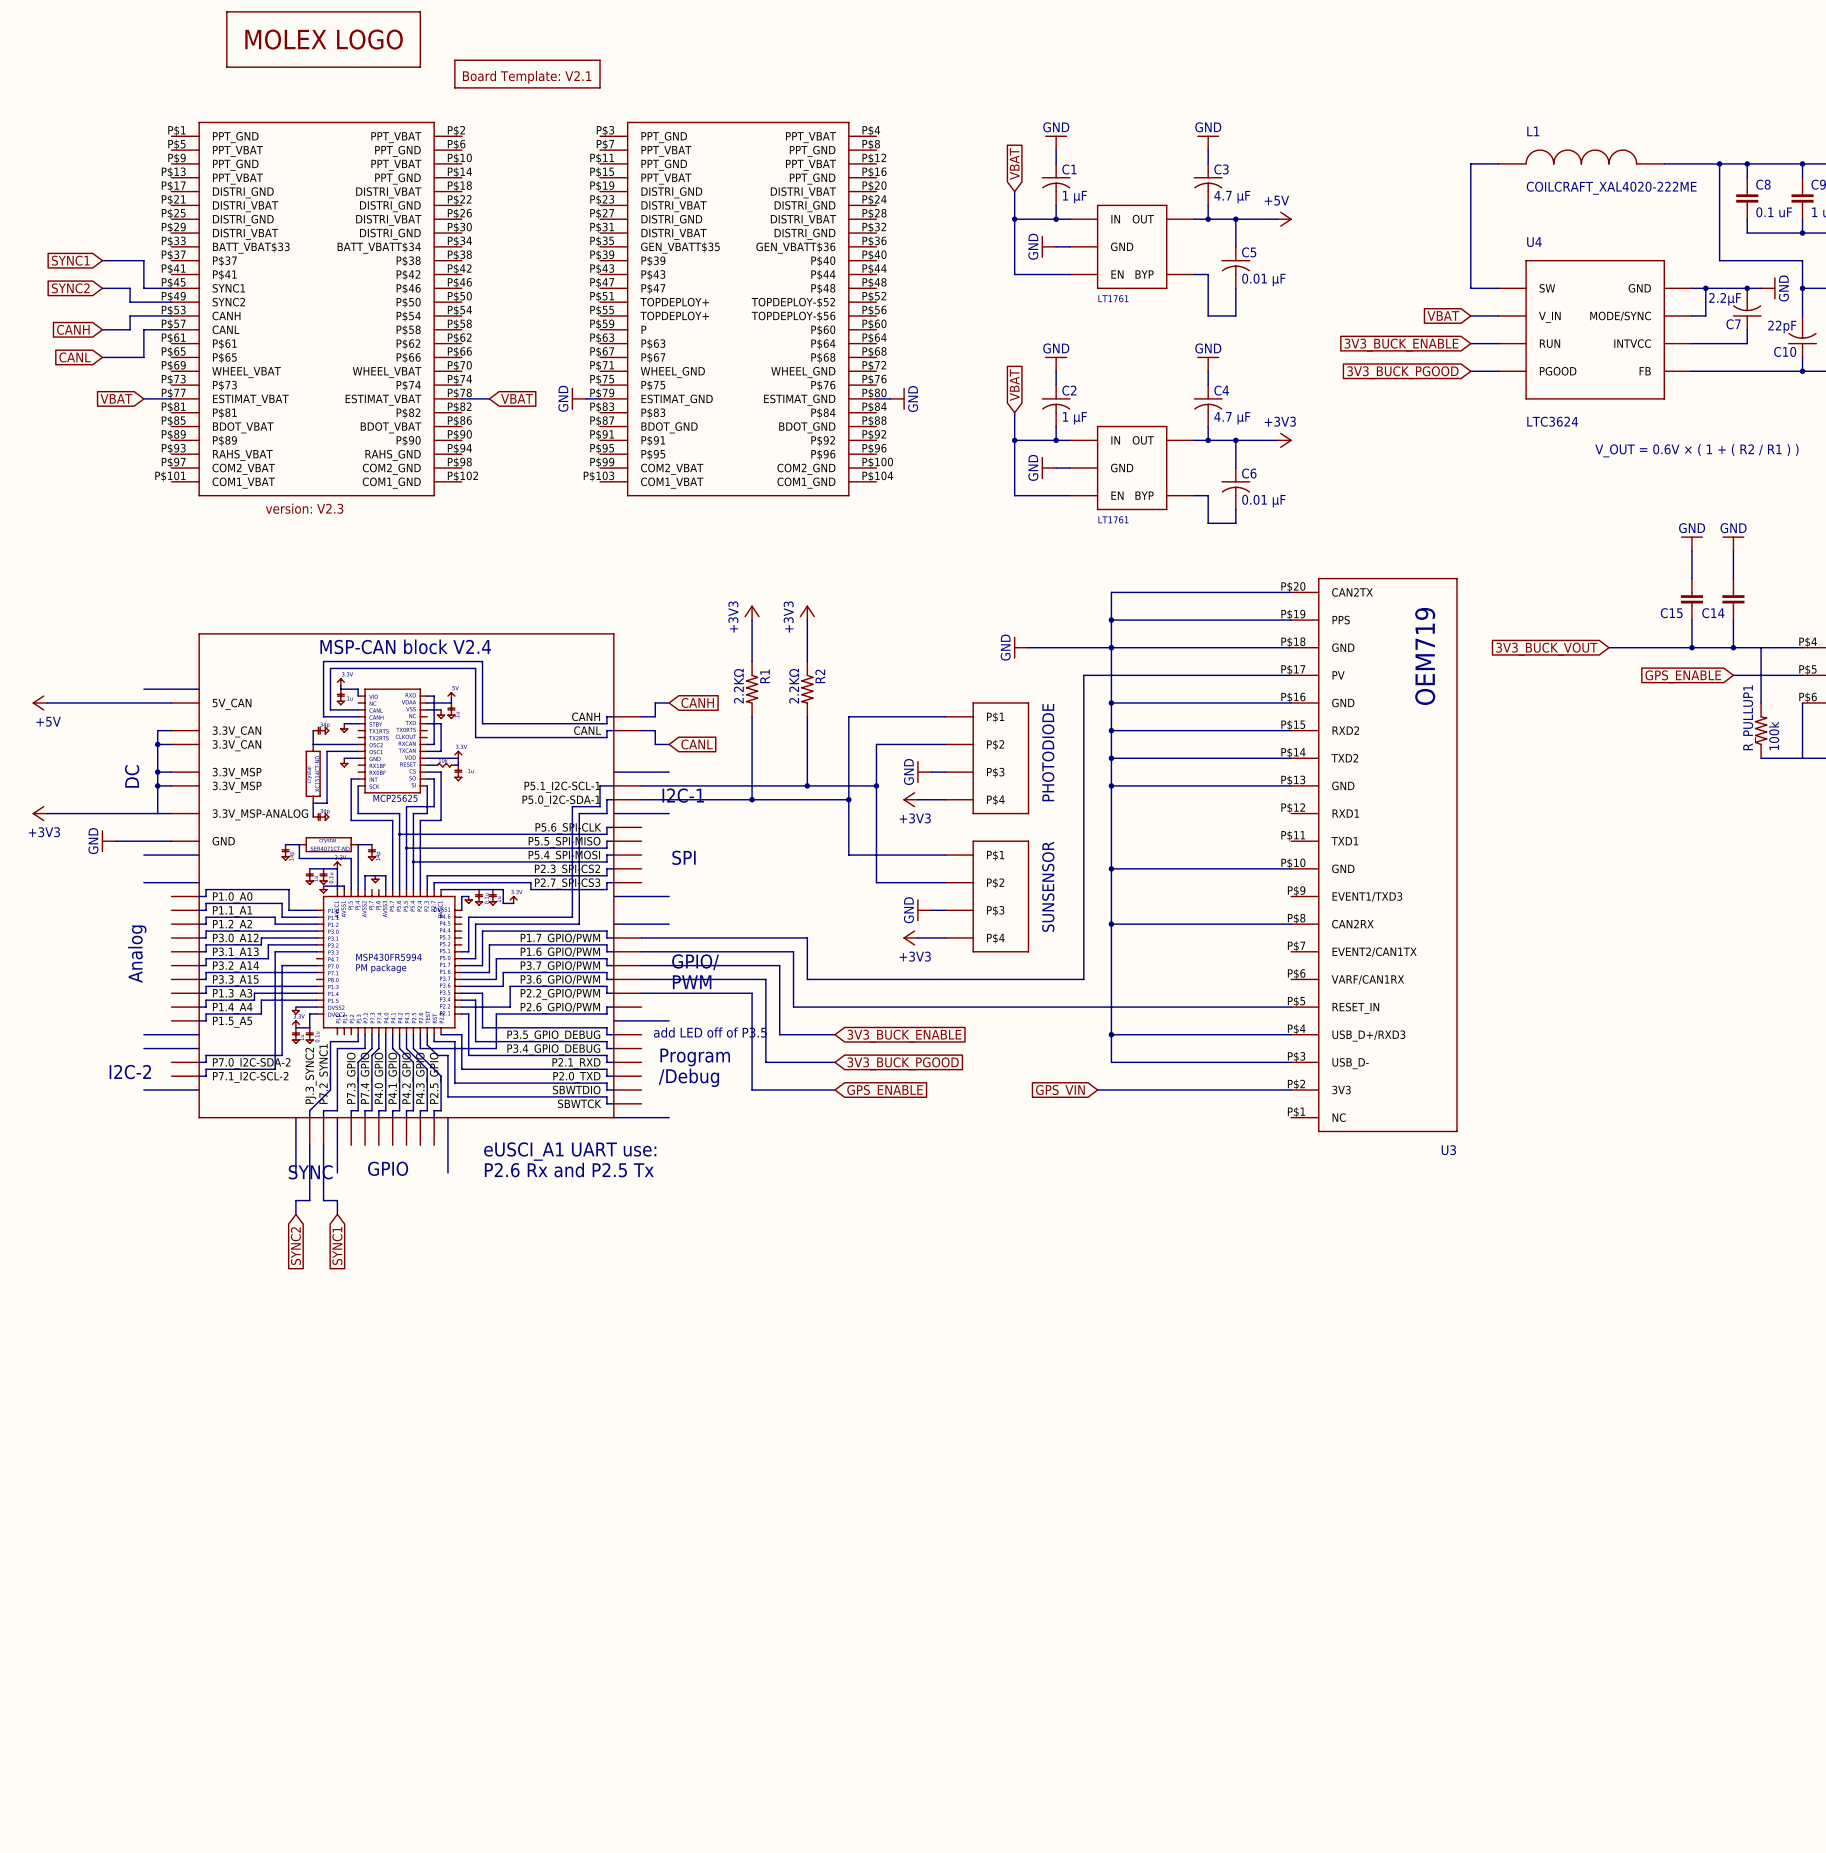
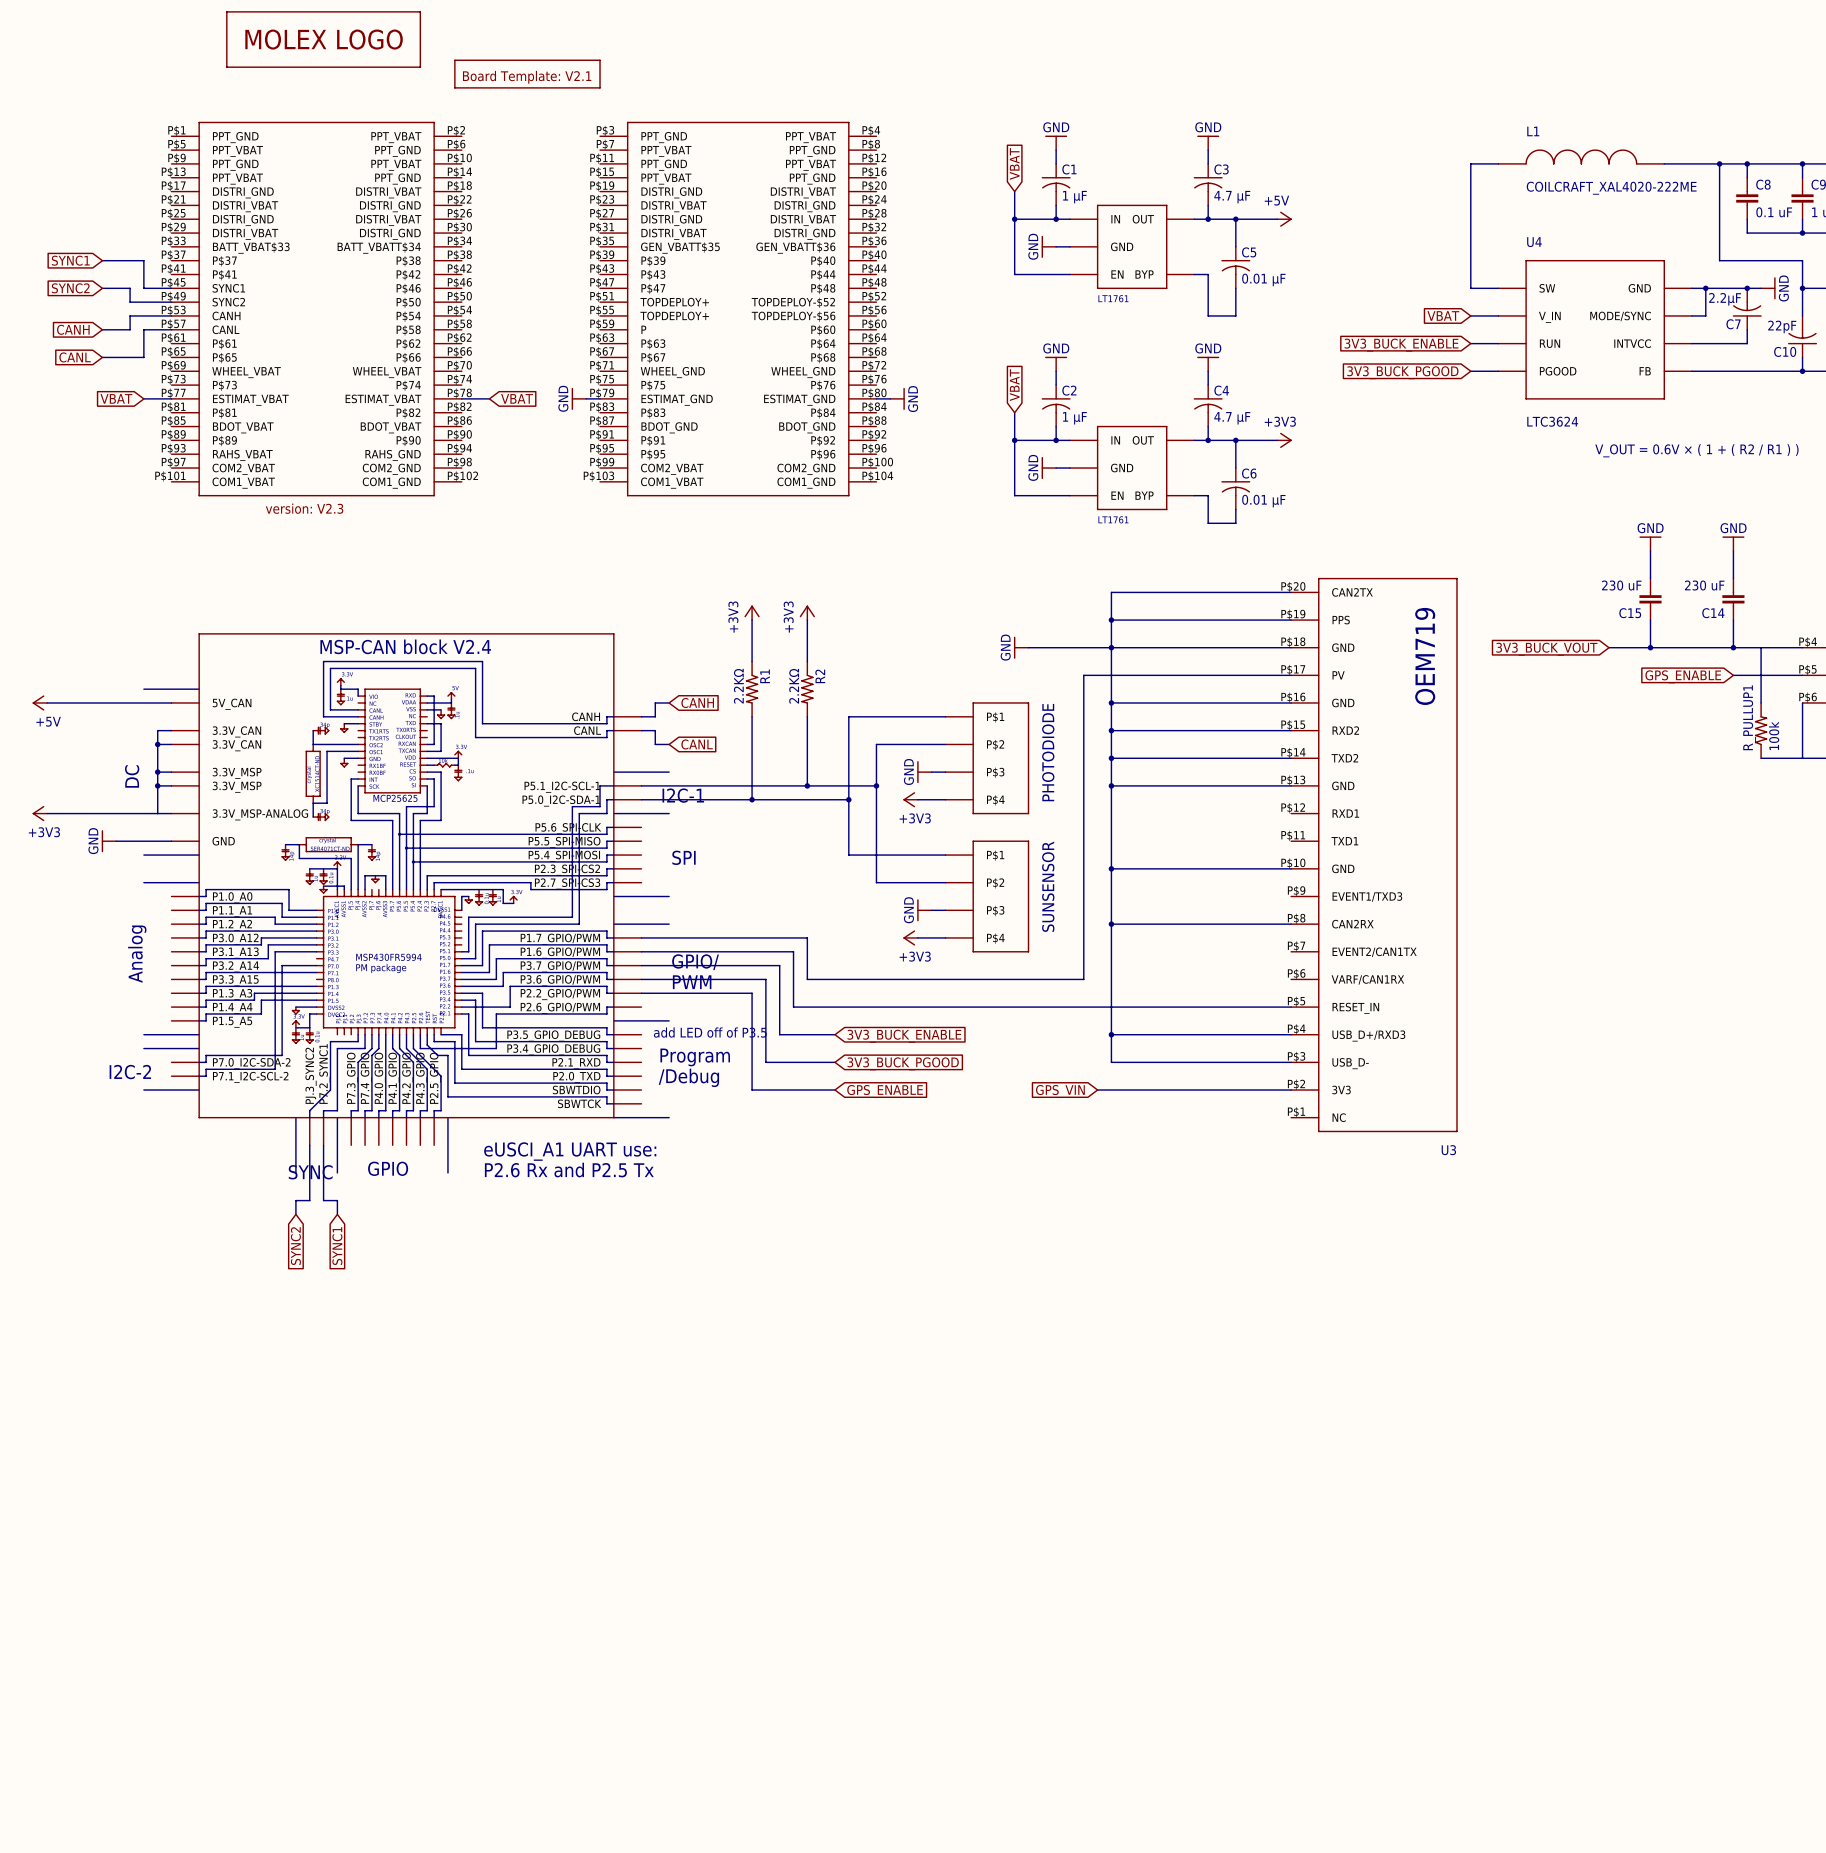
power symbol position: GND (1691, 543) -> GND (1650, 543)
wire: (1691, 550) (1691, 578) -> (1650, 550) (1650, 578)
C15 value: none -> 230 uF (1621, 585)
C14 value: none -> 230 uF (1704, 585)
C15 position: (1691, 599) -> (1650, 599)
wire: (1691, 620) (1691, 647) -> (1650, 620) (1650, 647)
junction: none -> (1650, 647)
junction: (1691, 647) -> none

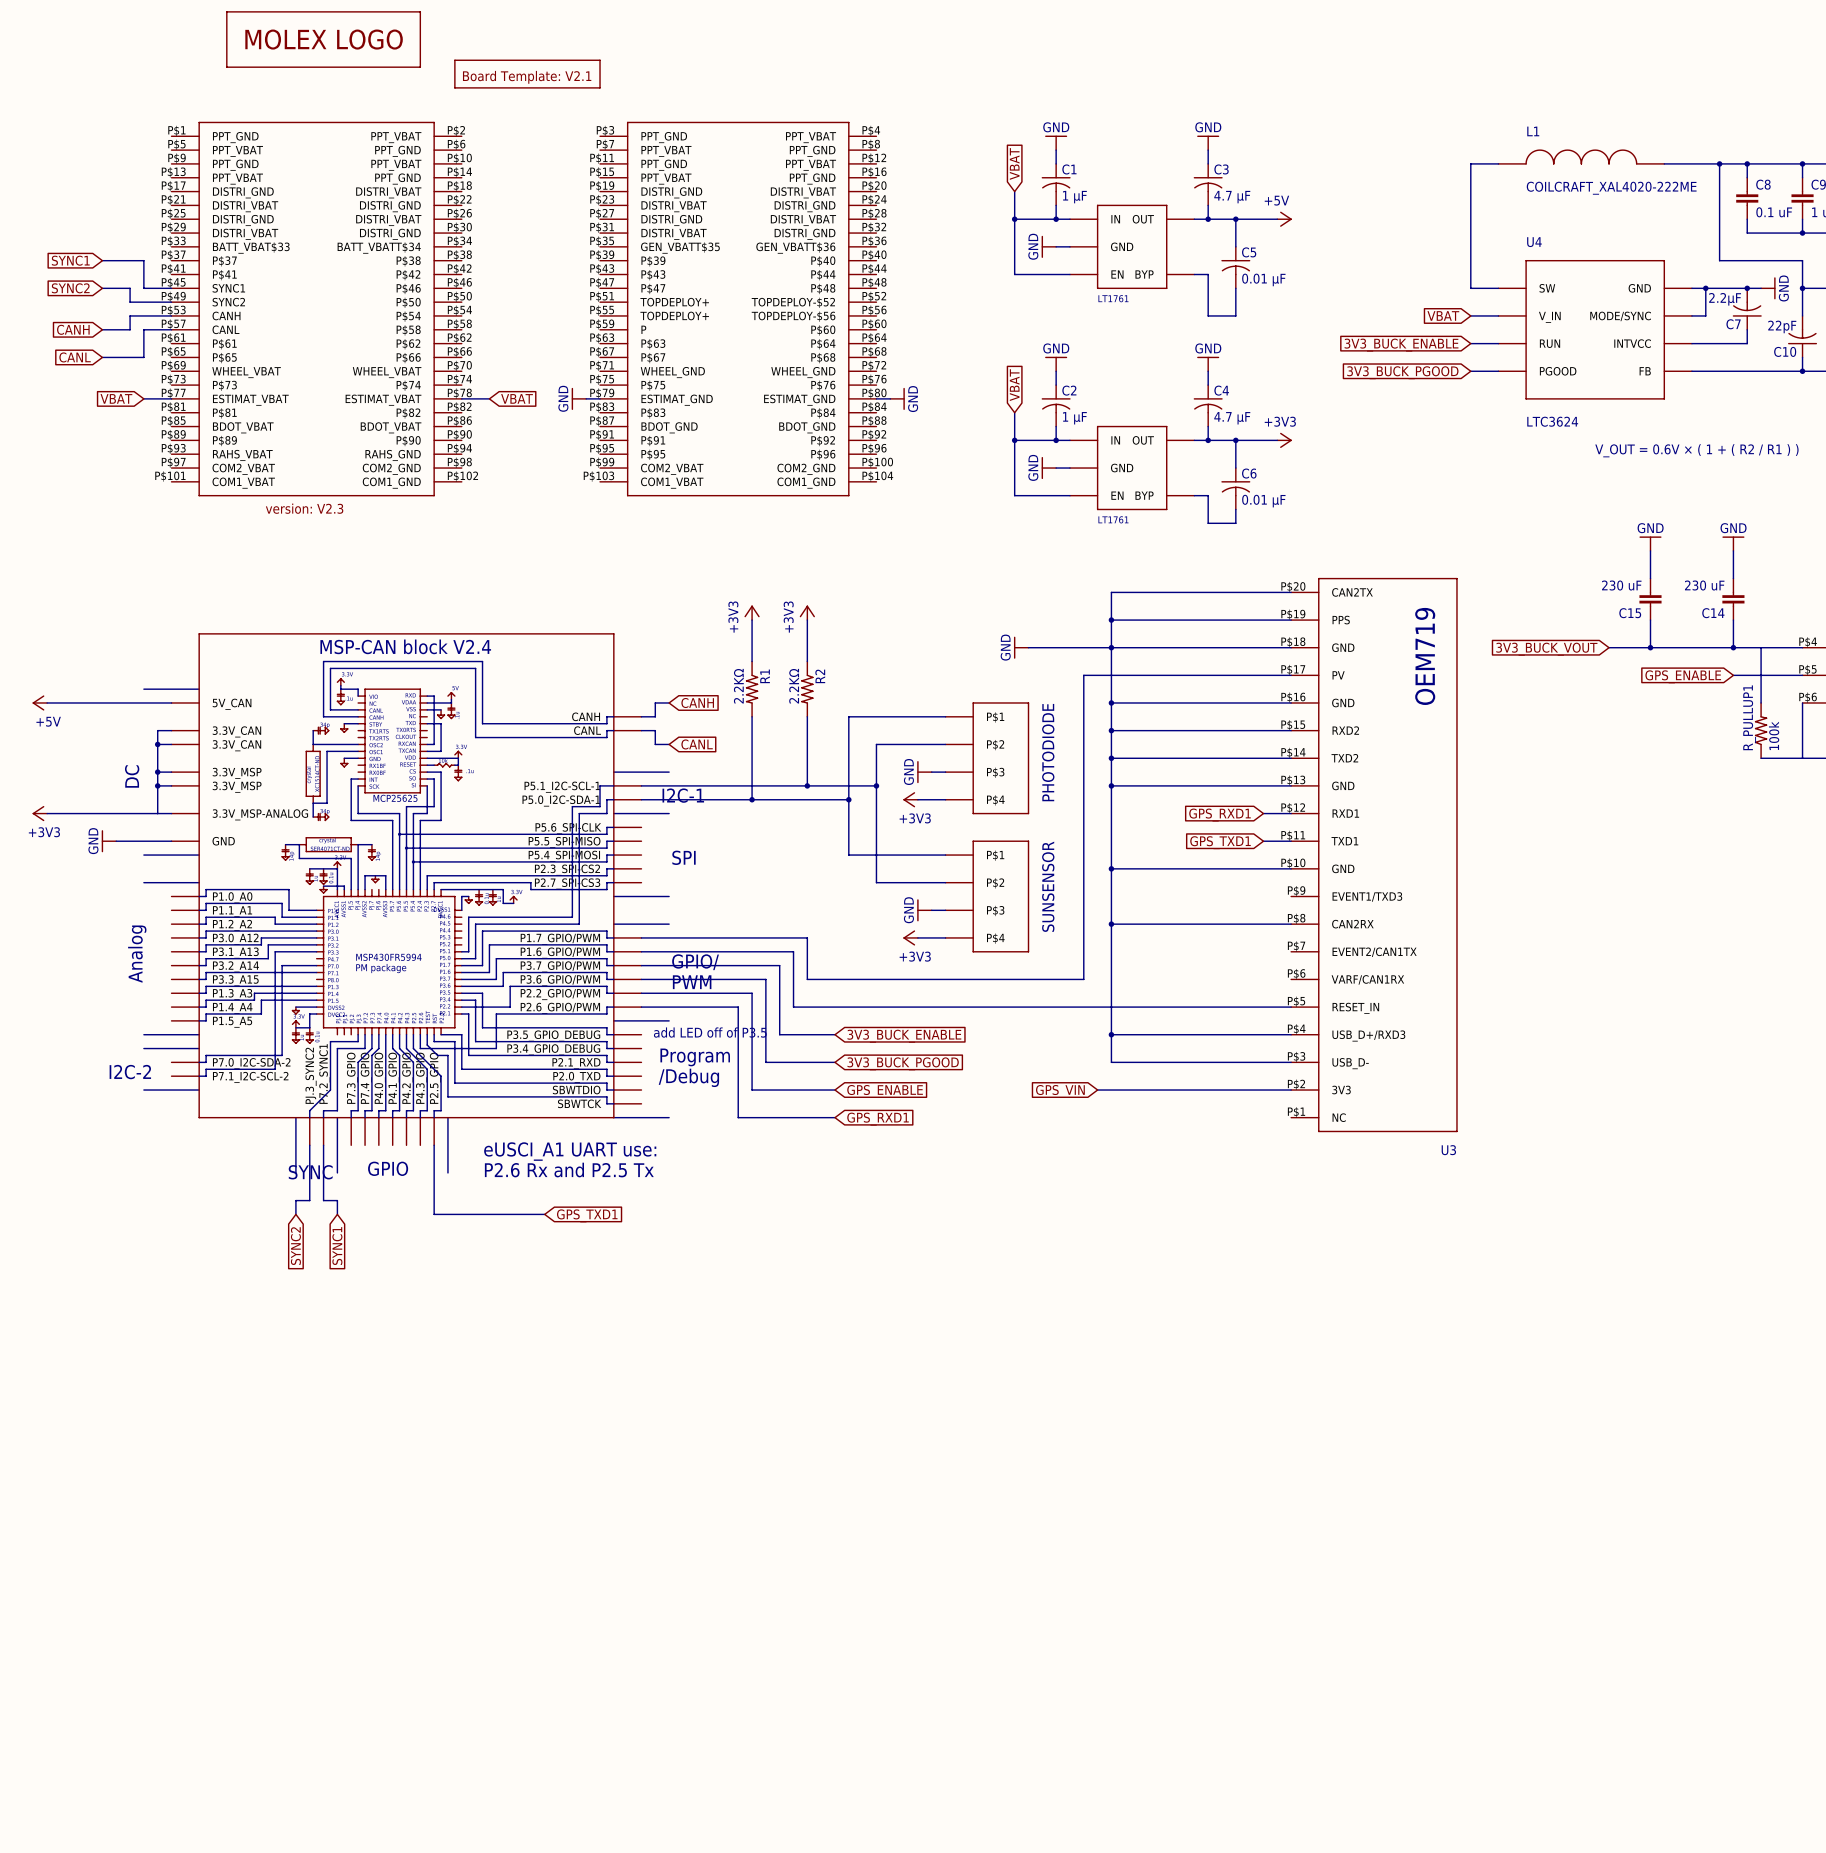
wire: none -> (1263, 813) (1291, 813)
global label: none -> GPS_RXD1 (1220, 815)
wire: none -> (1263, 841) (1291, 841)
global label: none -> GPS_TXD1 (1220, 842)
wire: none -> (641, 1007) (738, 1007) (738, 1117) (834, 1117)
global label: none -> GPS_RXD1 (878, 1119)
wire: none -> (434, 1145) (434, 1214) (544, 1214)
global label: none -> GPS_TXD1 (587, 1215)

